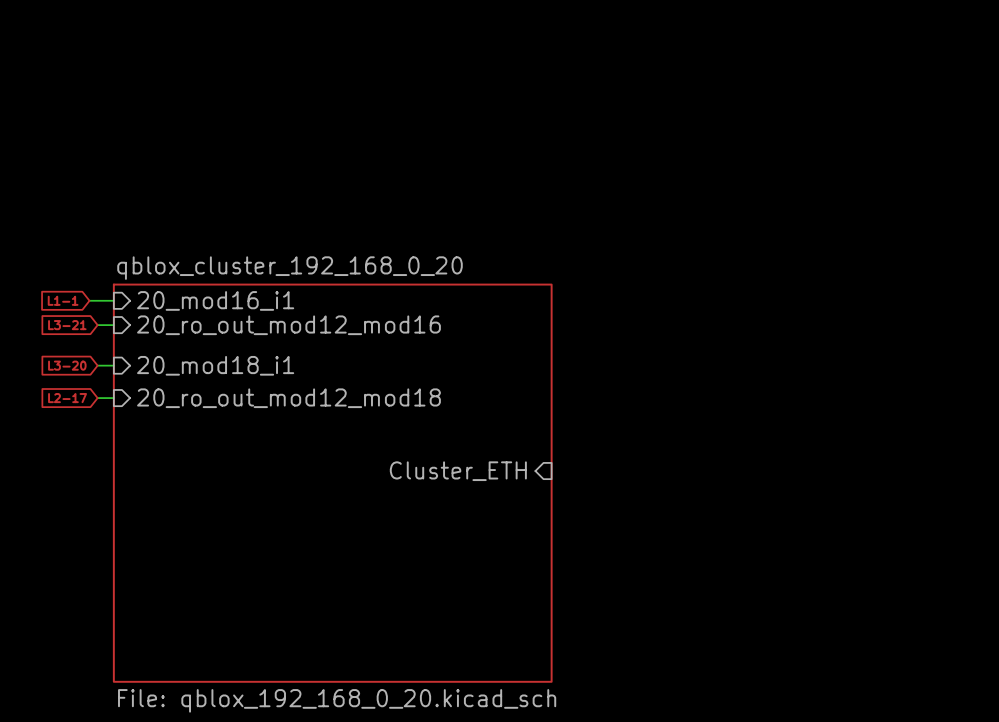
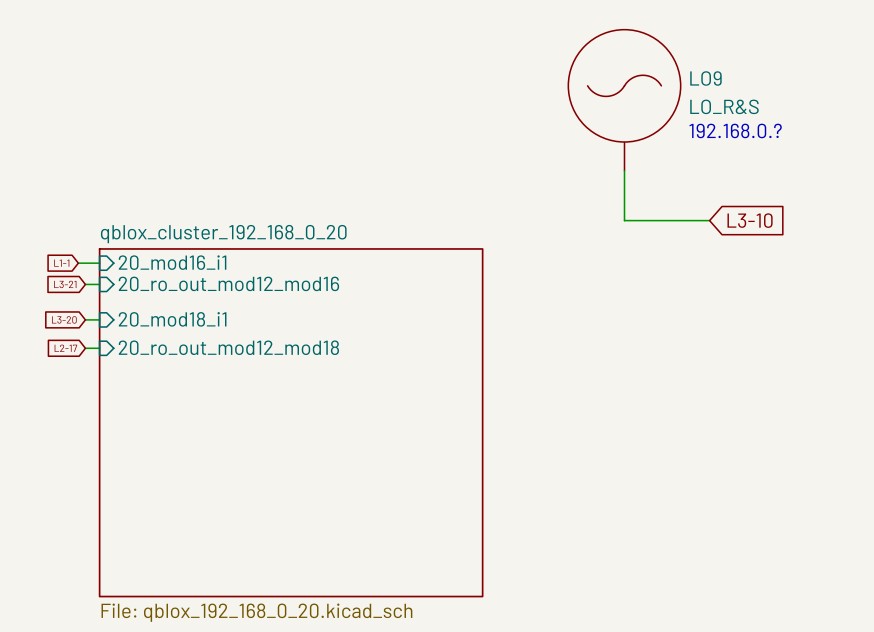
LO9: none -> LO_R&S (624, 100)
text: none -> 192.168.0.? (735, 130)
wire: none -> (624, 170) (624, 220) (709, 220)
global label: none -> L3-10 (750, 220)
sheet pin: Cluster_ETH (458, 471) -> none

